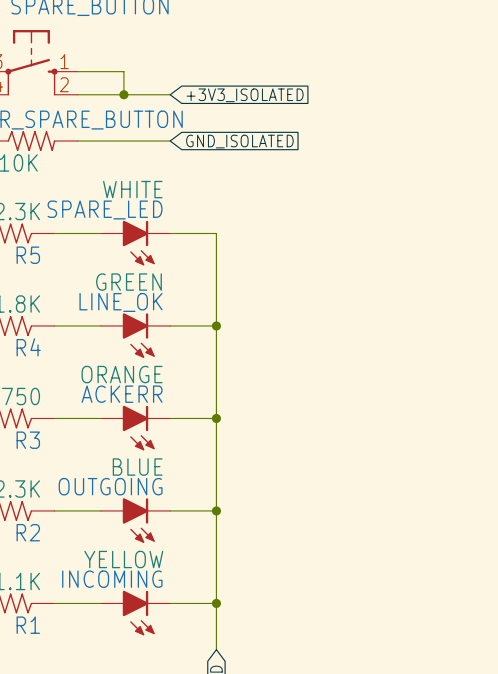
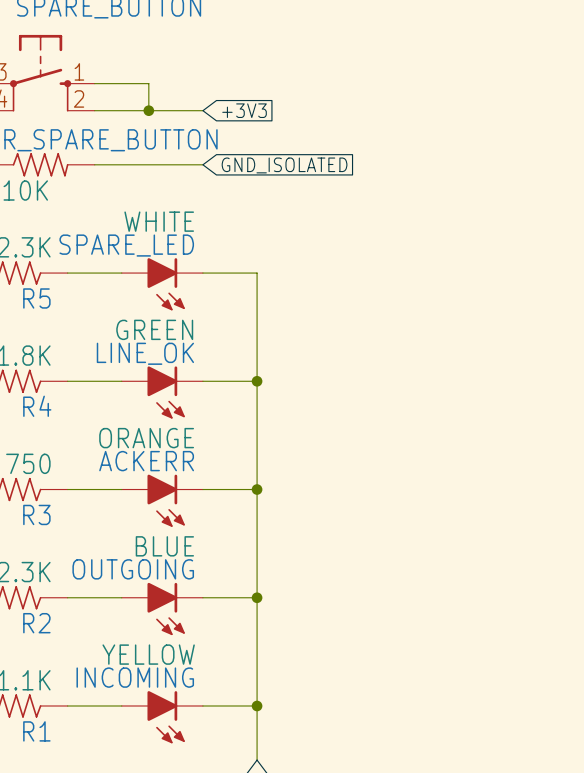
global label: +3V3_ISOLATED (245, 95) -> +3V3 (244, 110)

